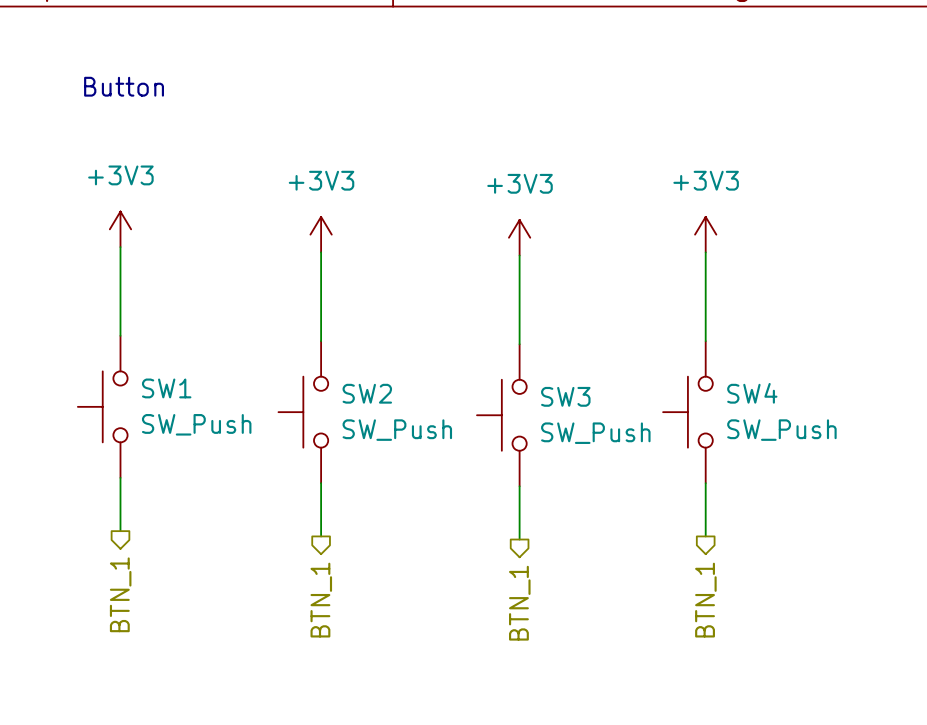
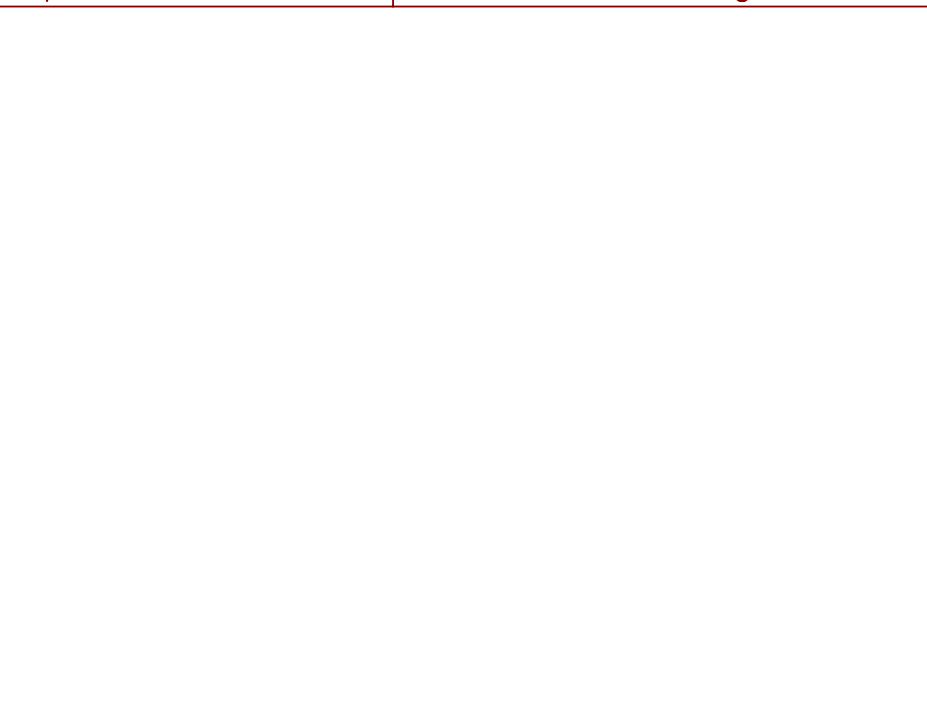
text: Button (124, 86) -> none
power symbol: +3V3 (120, 229) -> none
power symbol: +3V3 (321, 234) -> none
power symbol: +3V3 (705, 234) -> none
power symbol: +3V3 (519, 237) -> none
wire: (120, 247) (120, 335) -> none
wire: (321, 252) (321, 341) -> none
wire: (705, 252) (705, 341) -> none
wire: (519, 255) (519, 344) -> none
SW1: SW_Push (102, 406) -> none
SW2: SW_Push (303, 412) -> none
SW4: SW_Push (687, 412) -> none
SW3: SW_Push (501, 415) -> none
wire: (120, 477) (120, 531) -> none
wire: (321, 483) (321, 536) -> none
wire: (705, 483) (705, 536) -> none
wire: (519, 486) (519, 539) -> none
hierarchical label: BTN_1 (120, 594) -> none
hierarchical label: BTN_1 (321, 600) -> none
hierarchical label: BTN_1 (705, 600) -> none
hierarchical label: BTN_1 (519, 603) -> none

